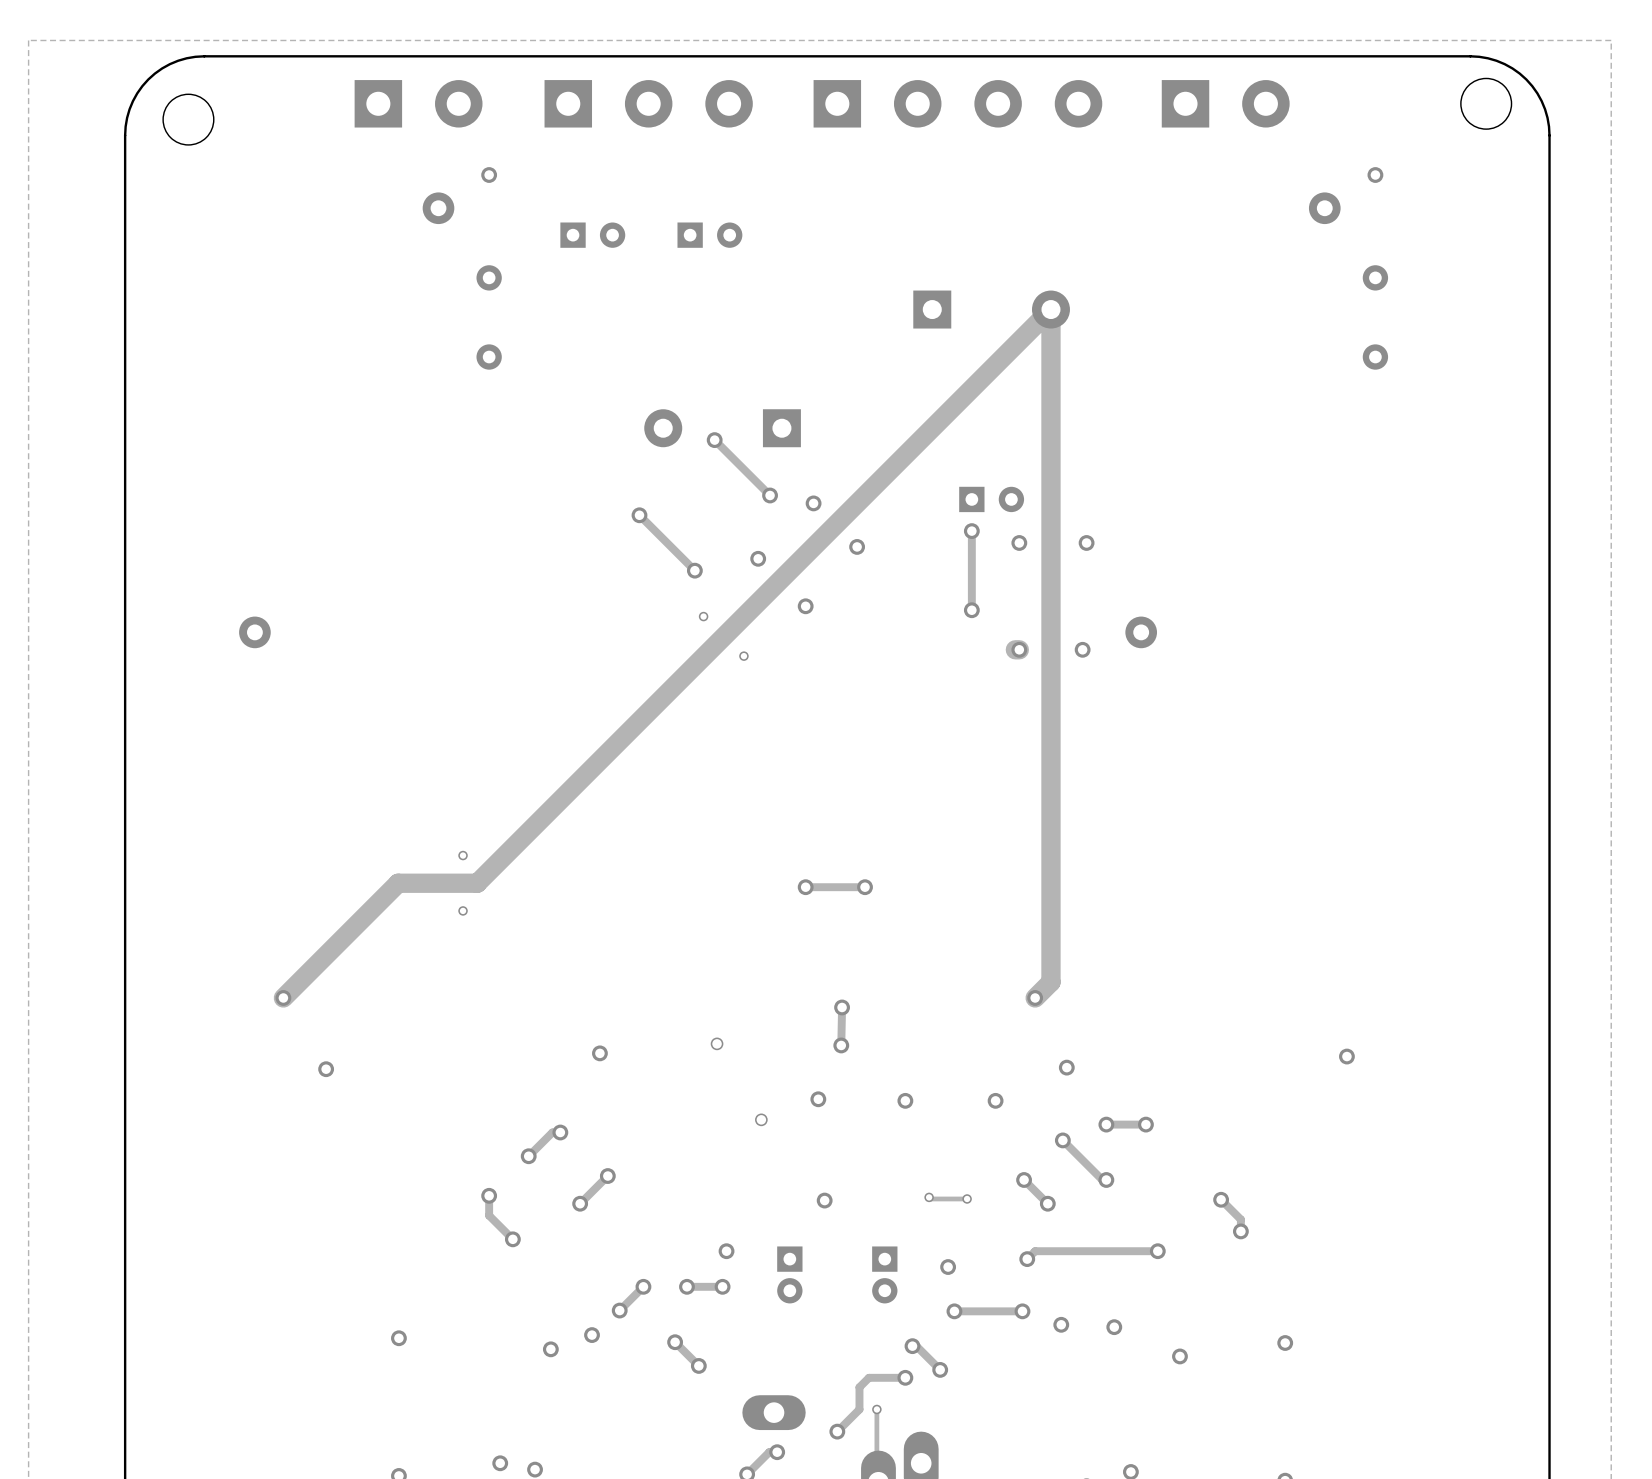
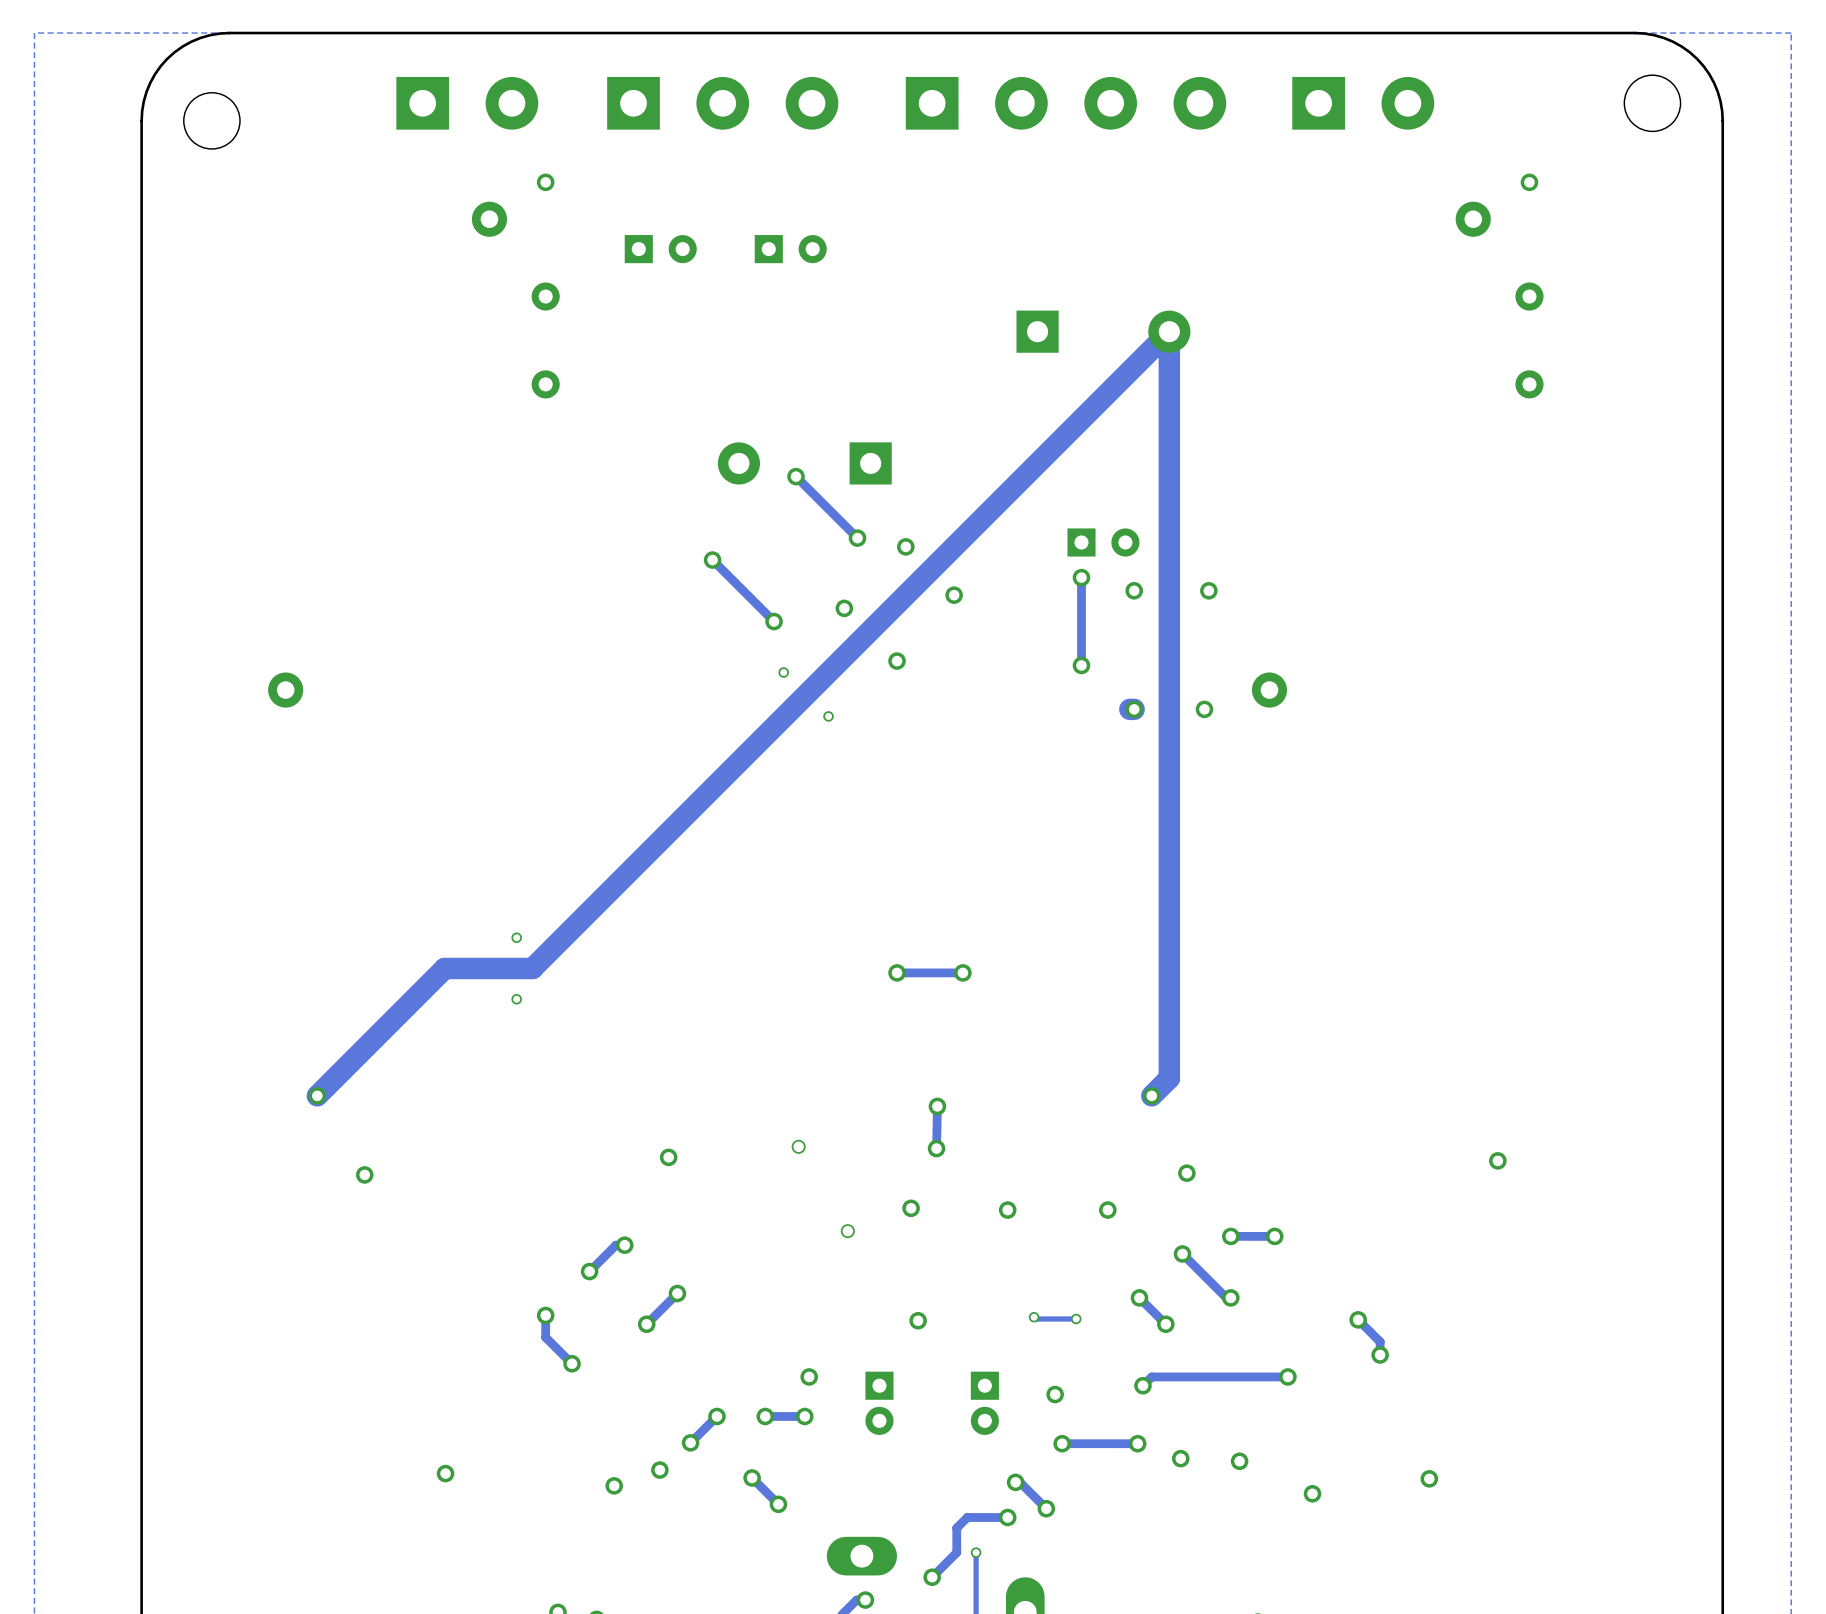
board edge: (1549, 135) (1547, 117) (1541, 101) (1526, 79) (1504, 64) (1487, 58) (1470, 56) (195, 56) (169, 64) (154, 73) (142, 86) (129, 109) (125, 135) -> (1722, 138) (1720, 101) (1714, 82) (1703, 66) (1689, 52) (1672, 41) (1654, 35) (1634, 33) (219, 33) (191, 41) (174, 52) (160, 66) (150, 82) (143, 101) (141, 138)

